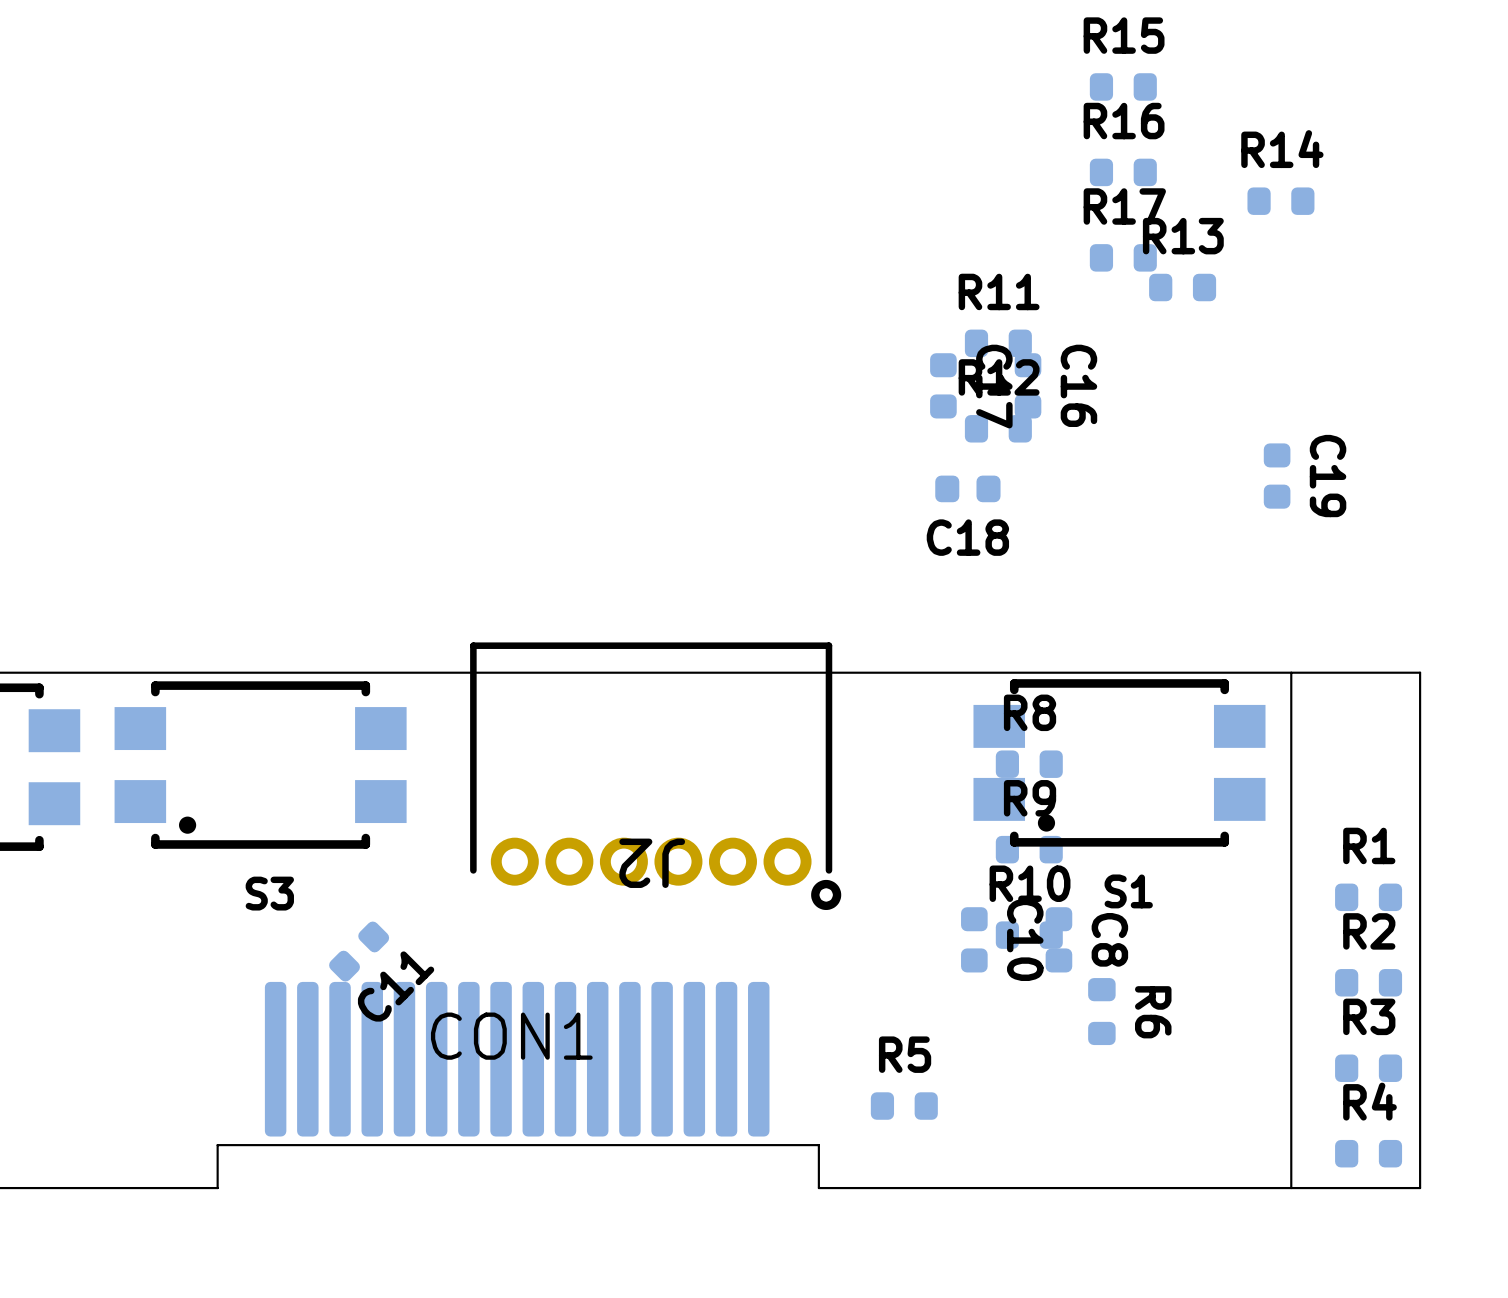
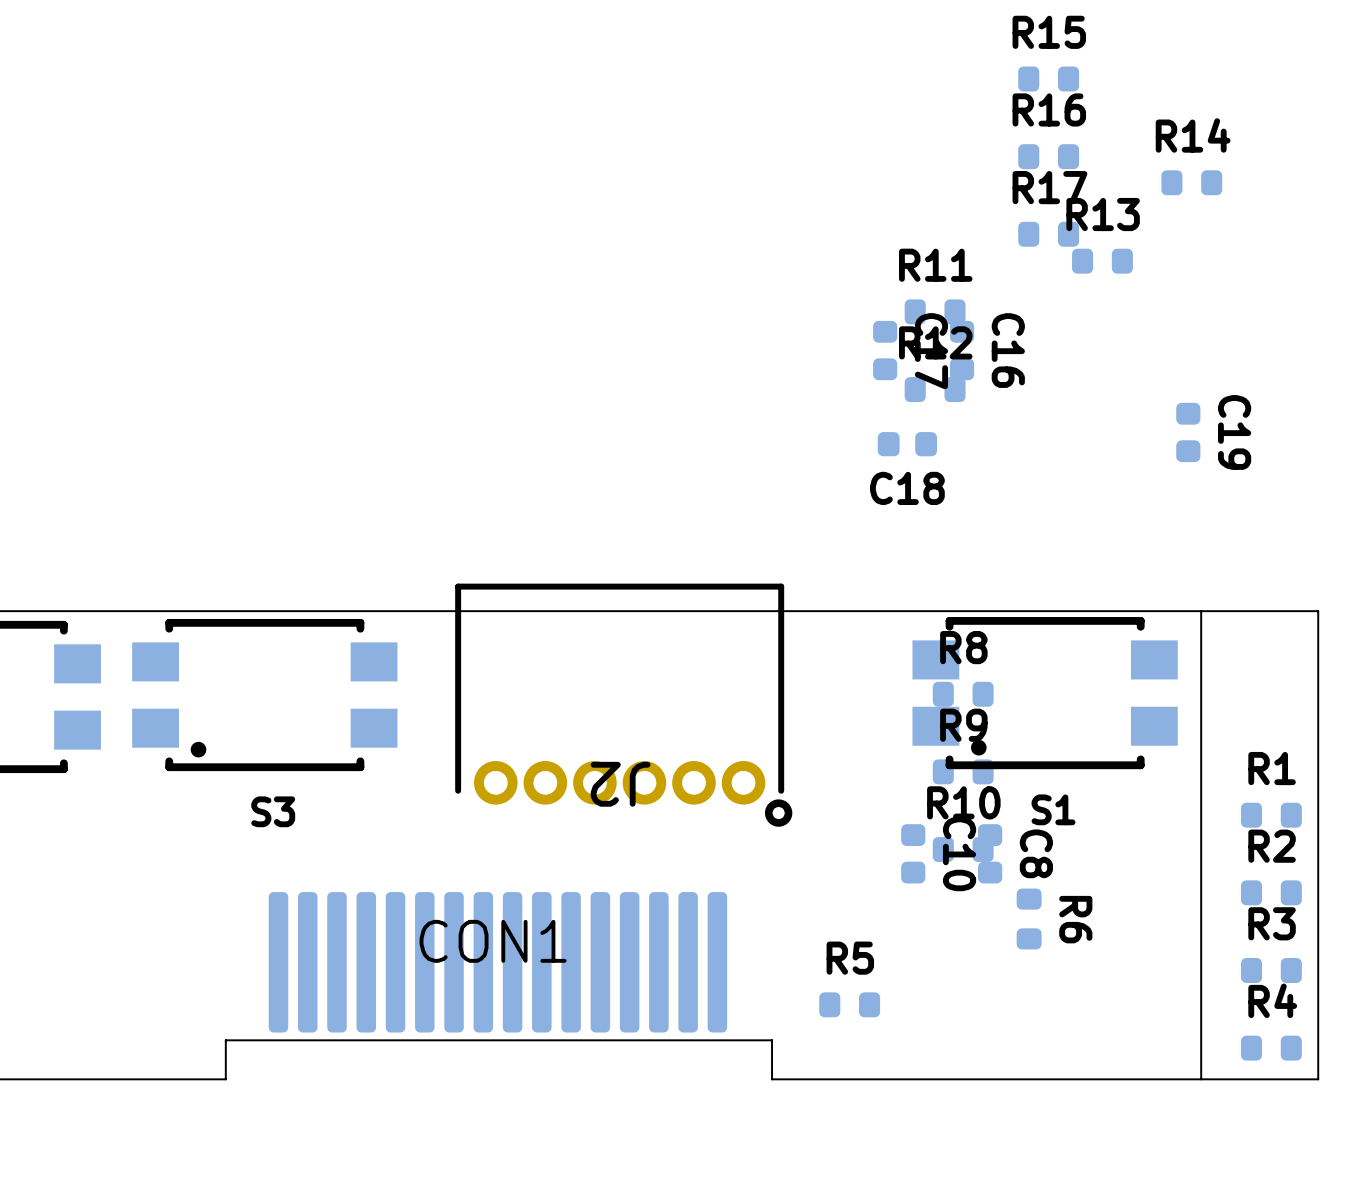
C11: (359, 951) -> none

